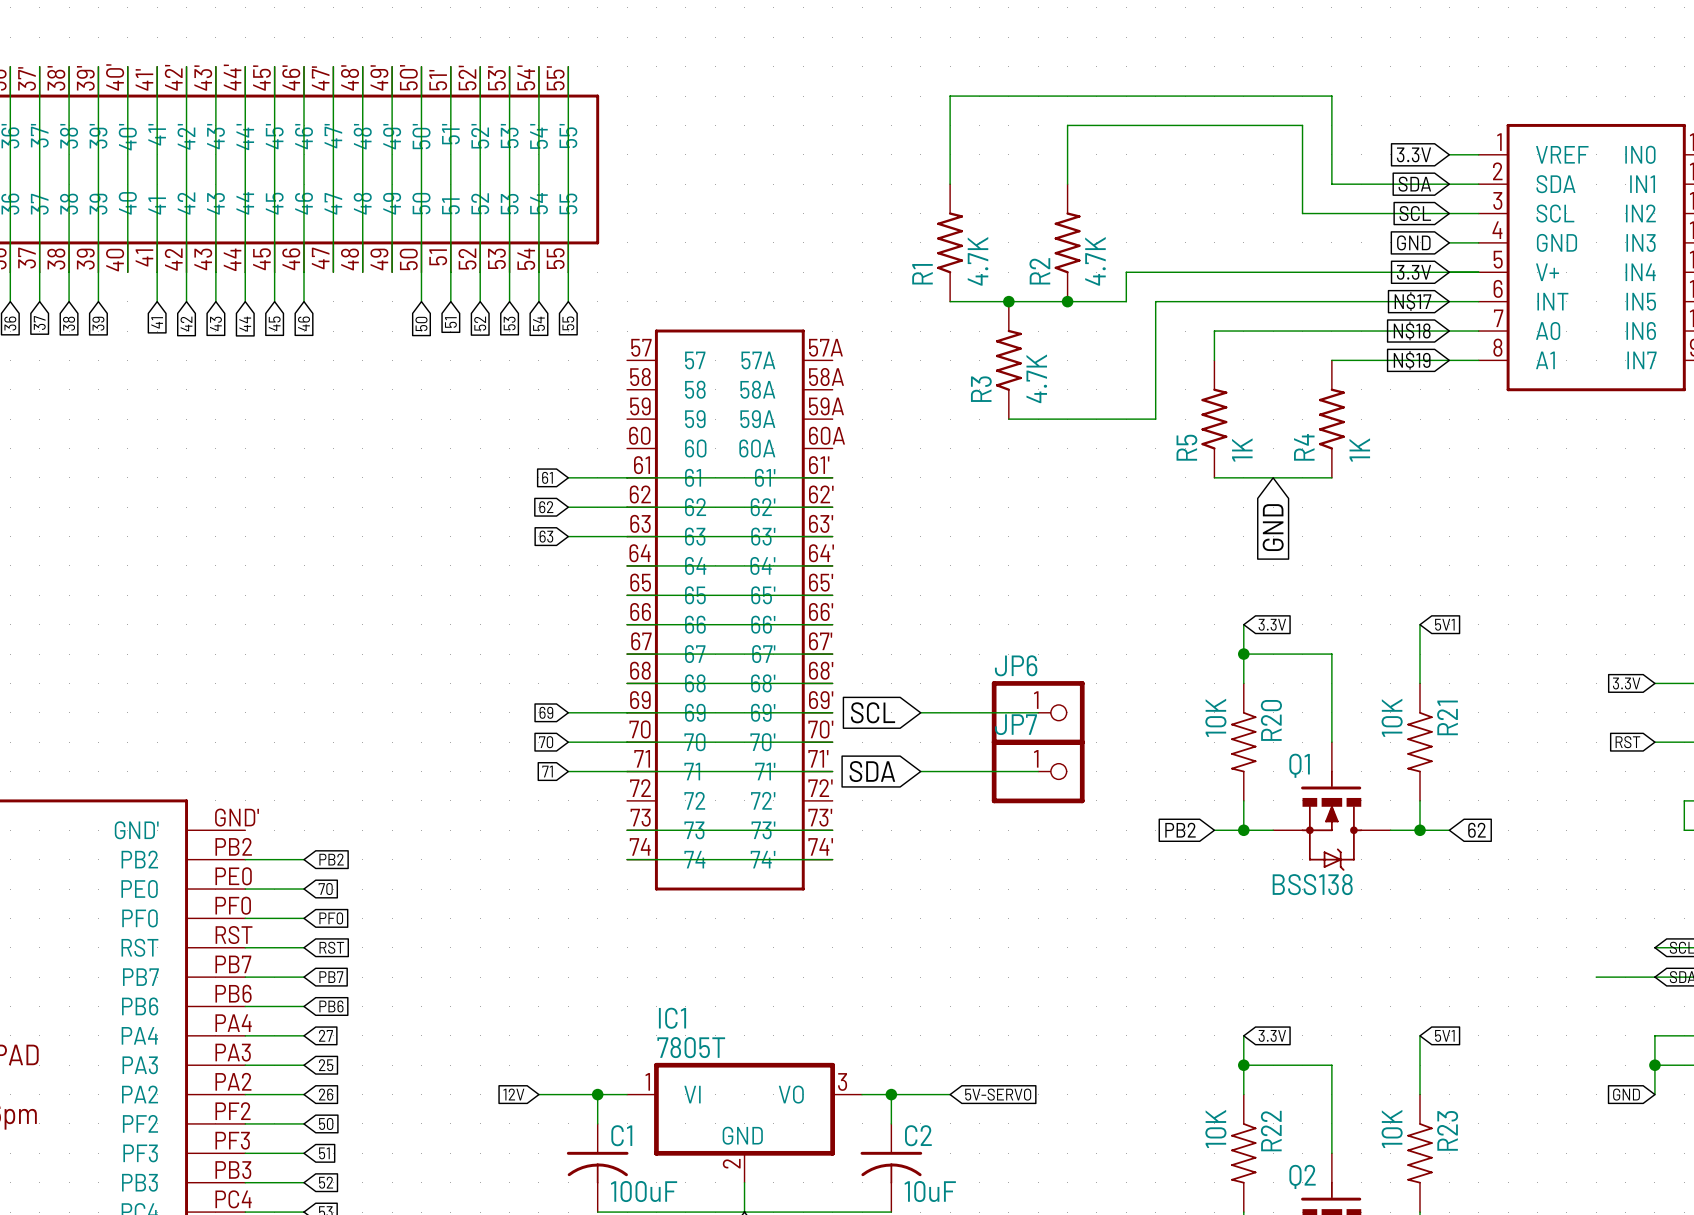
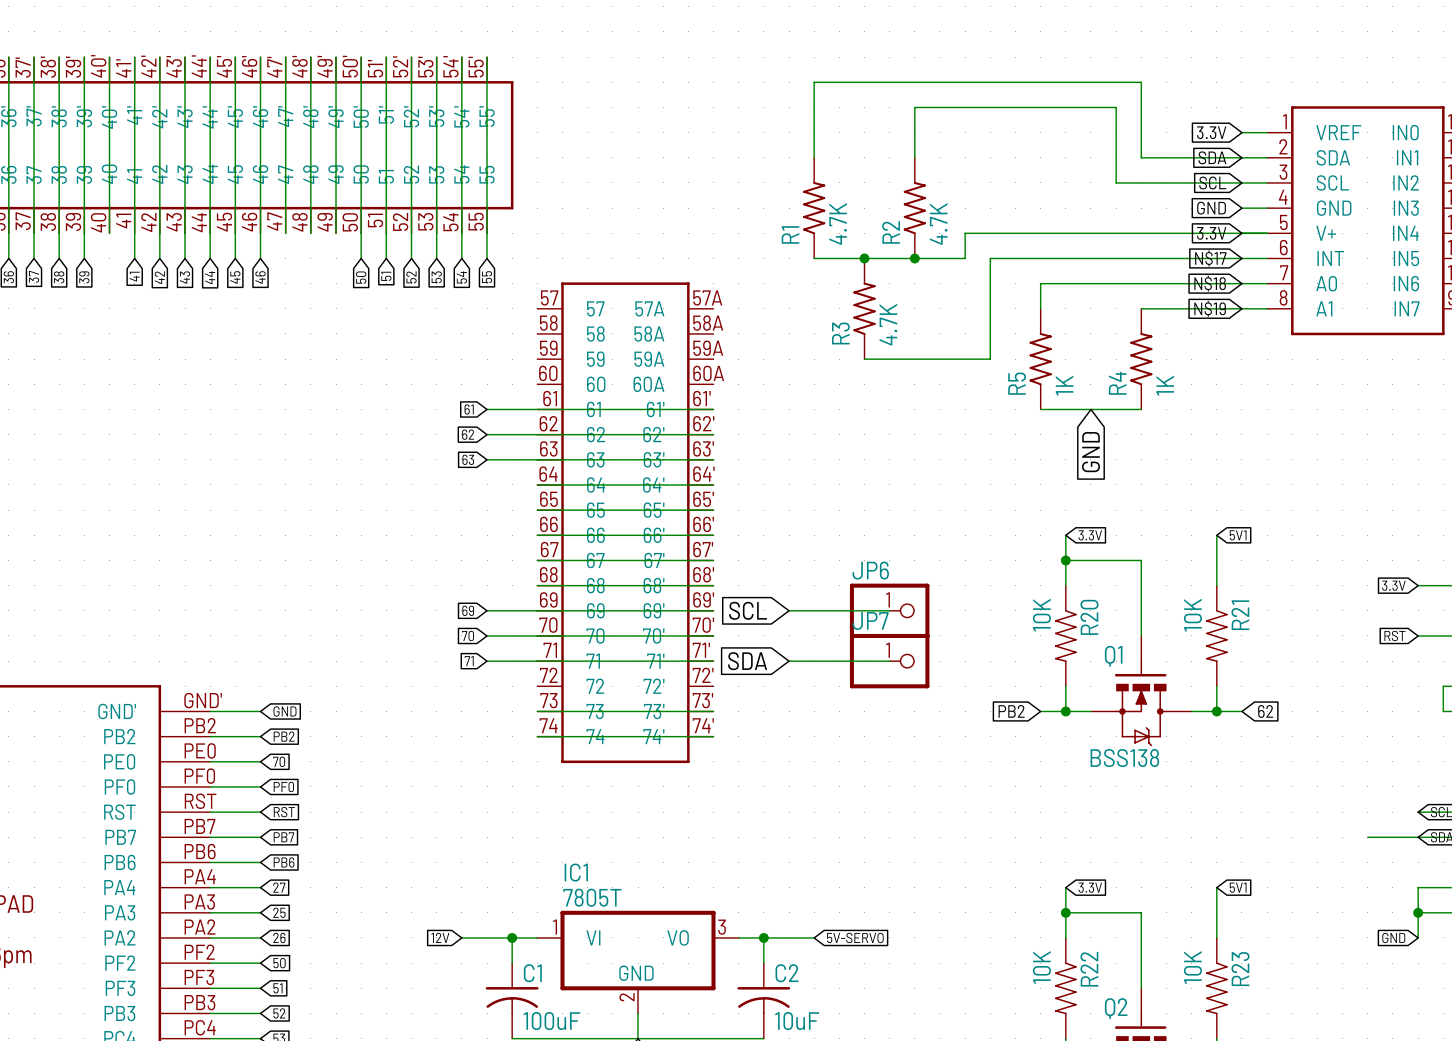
wire: none -> (210, 711) (260, 711)
global label: none -> GND (284, 711)

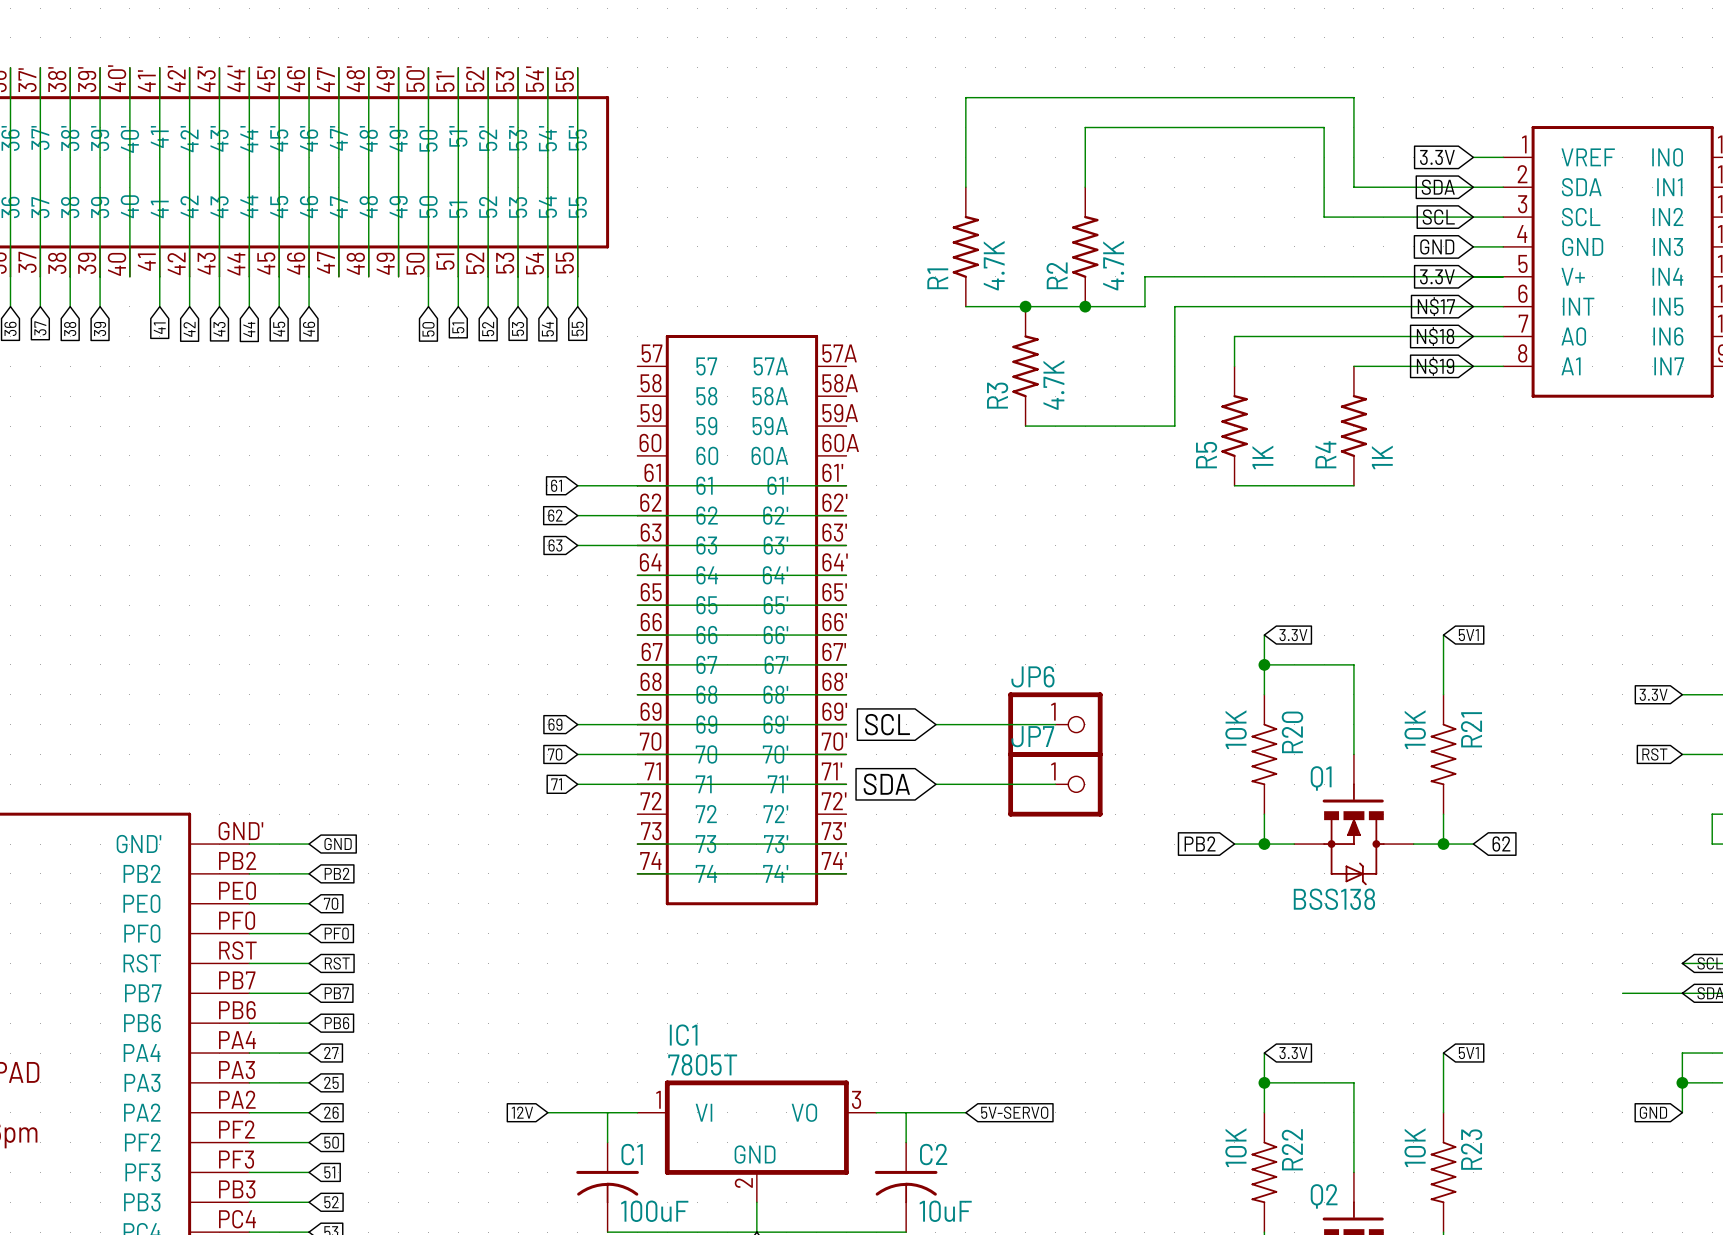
global label: GND (1090, 452) -> none
junction: (512, 937) -> none
junction: (763, 937) -> none

